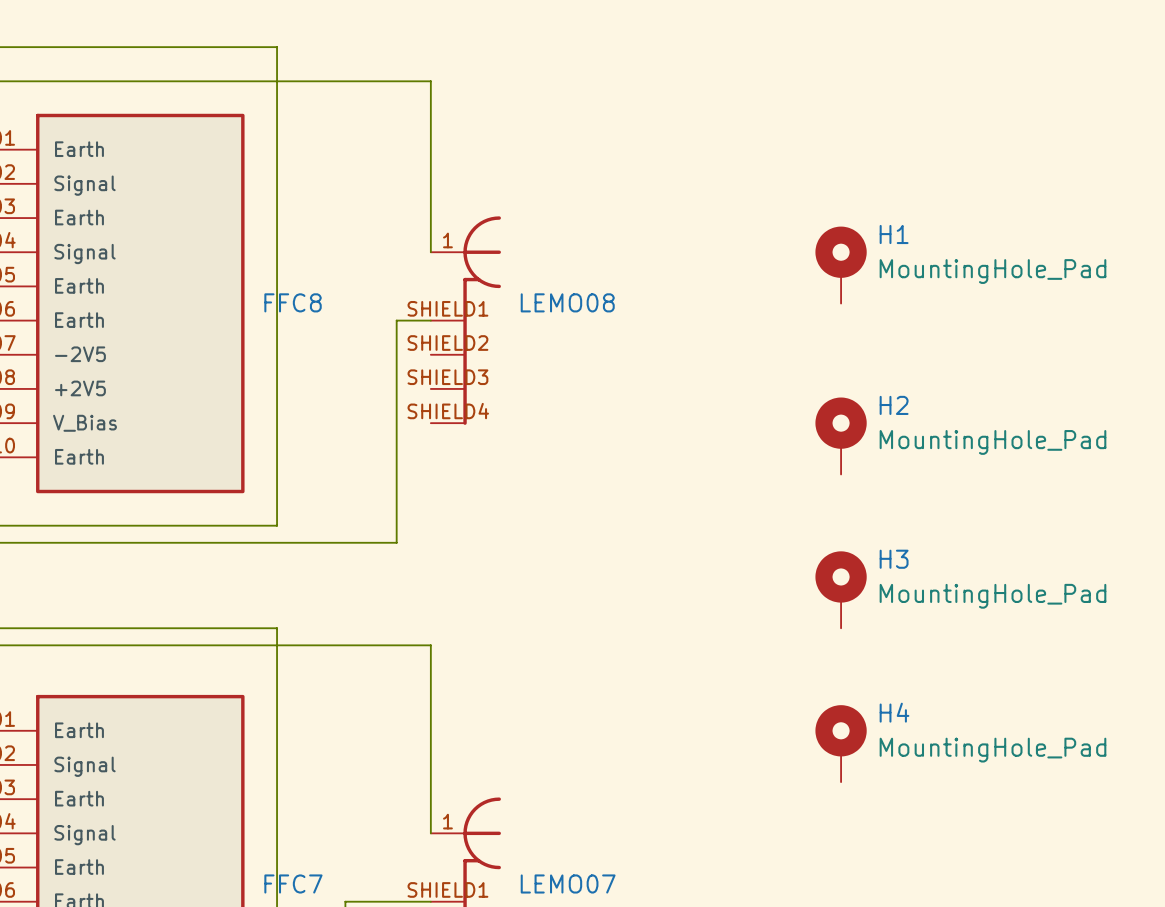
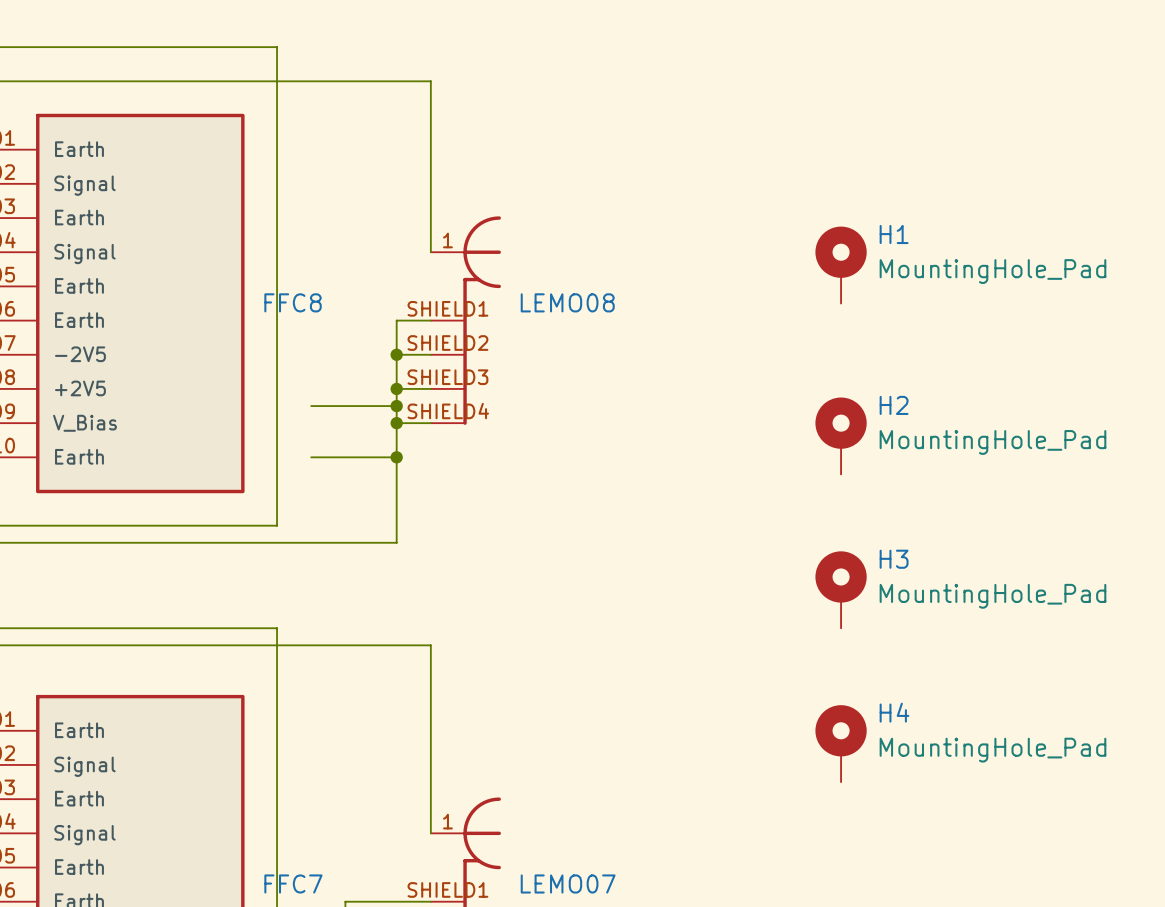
wire: none -> (396, 354) (430, 354)
junction: none -> (396, 354)
wire: none -> (396, 388) (430, 388)
junction: none -> (396, 388)
wire: none -> (311, 406) (396, 406)
junction: none -> (396, 406)
wire: none -> (396, 423) (430, 423)
junction: none -> (396, 423)
wire: none -> (311, 457) (396, 457)
junction: none -> (396, 457)

